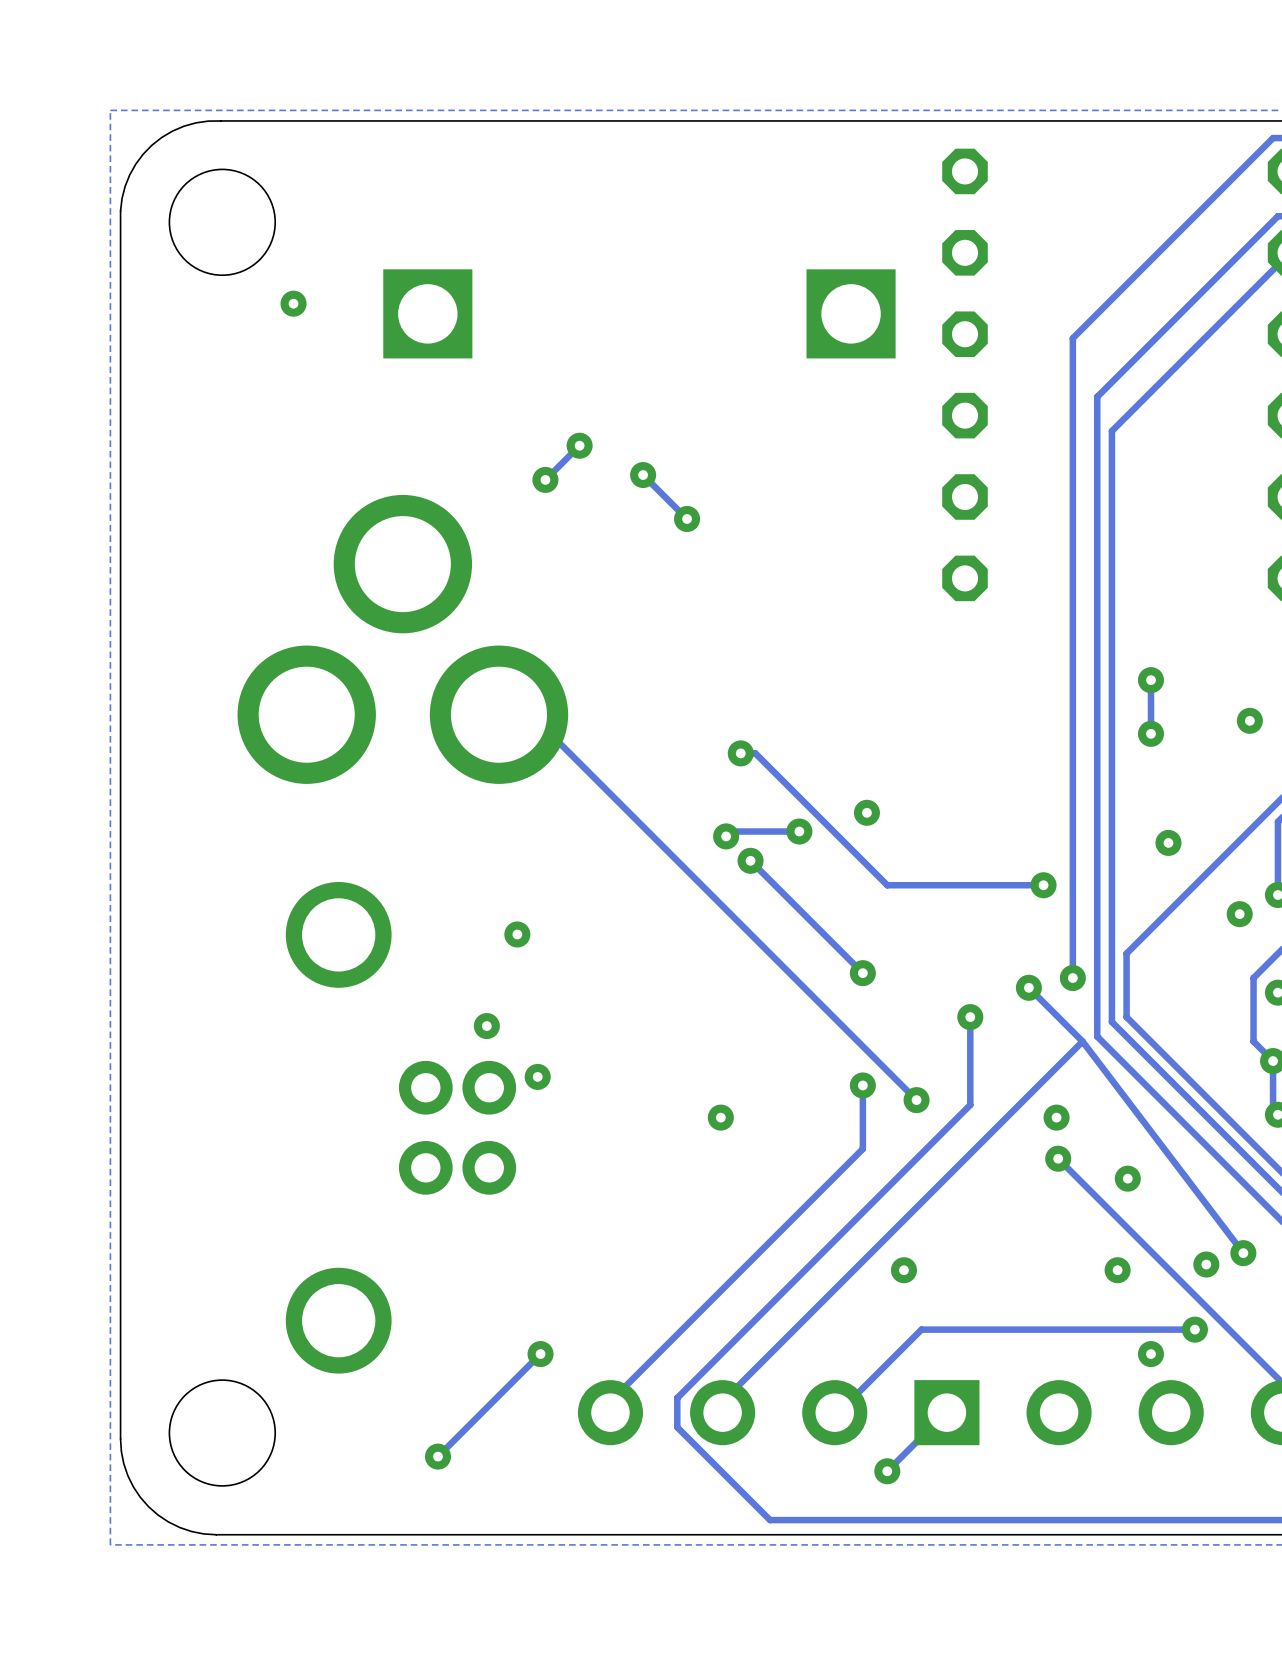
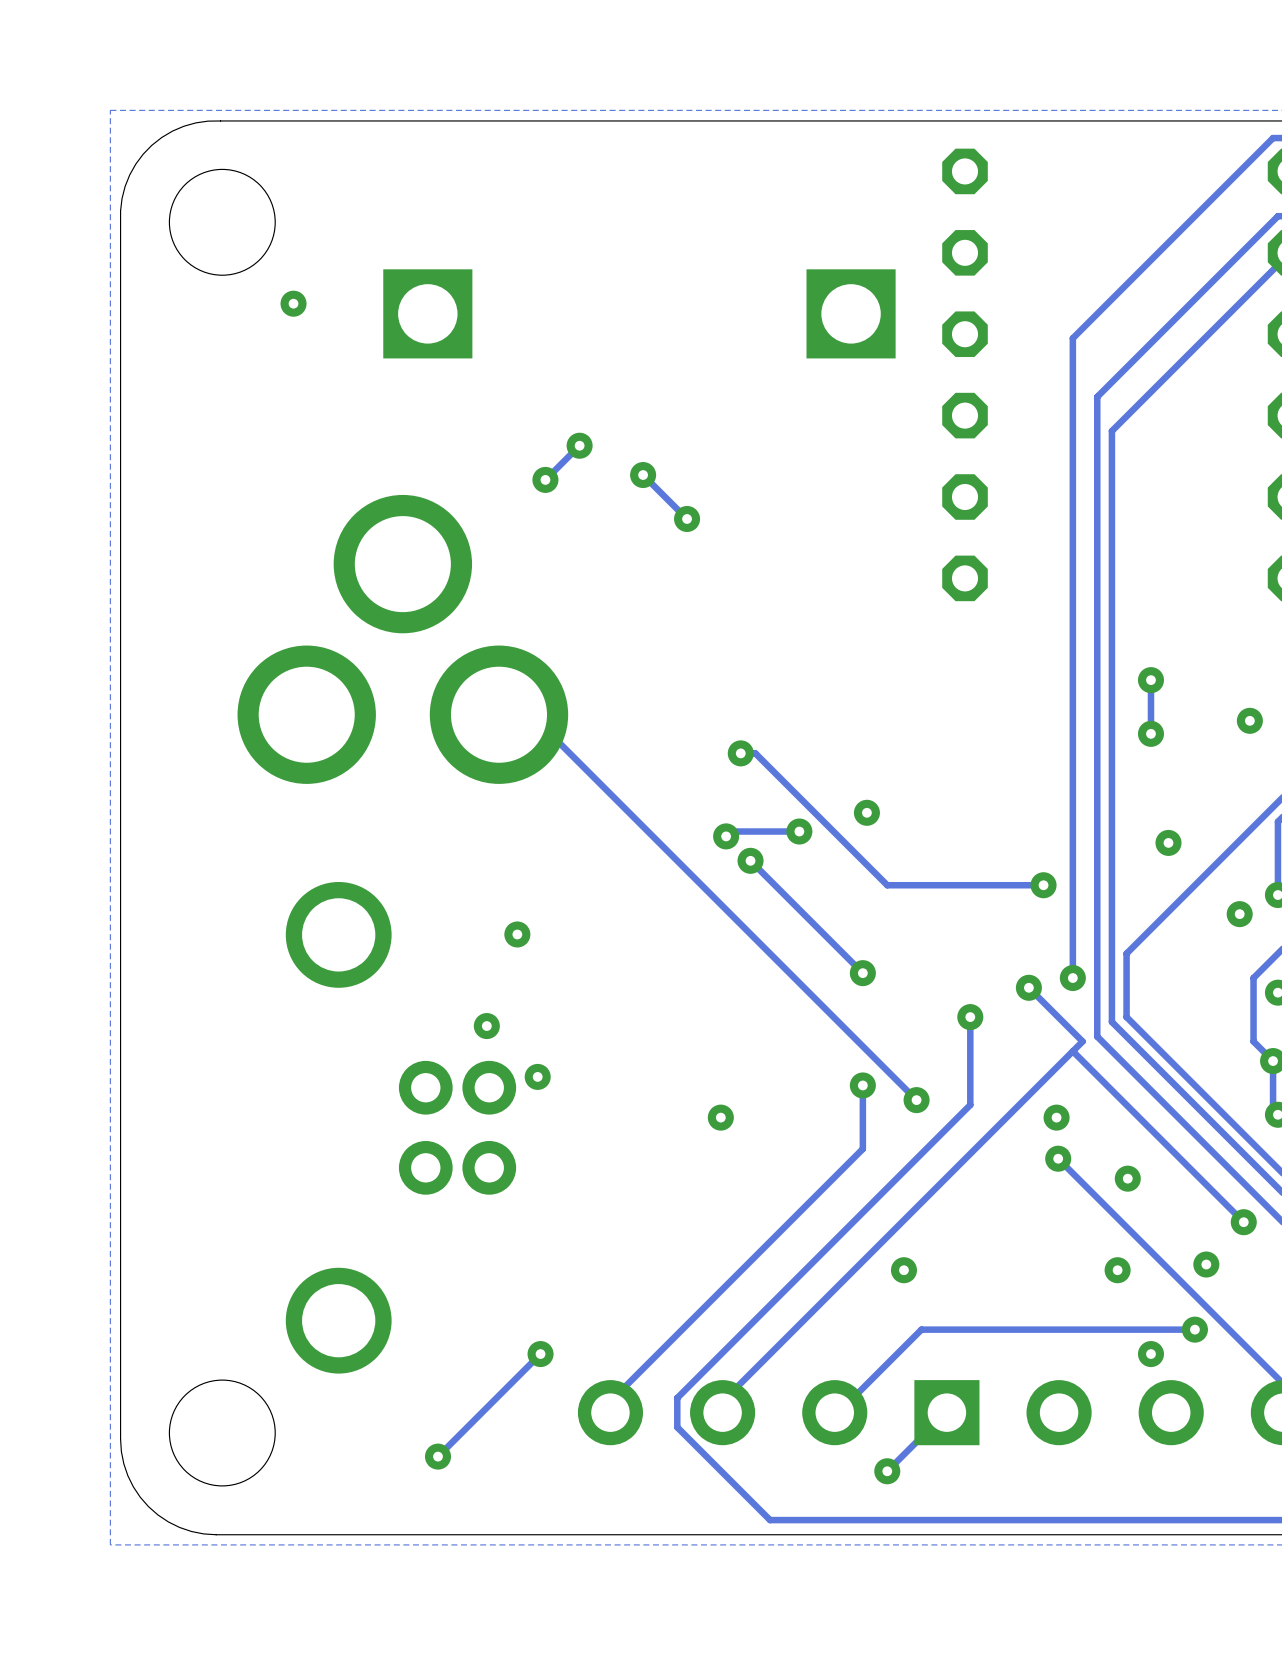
track: (1082, 1041) (1243, 1253) -> none
track: none -> (1072, 1051) (1243, 1222)
via position: (1243, 1253) -> (1243, 1222)

